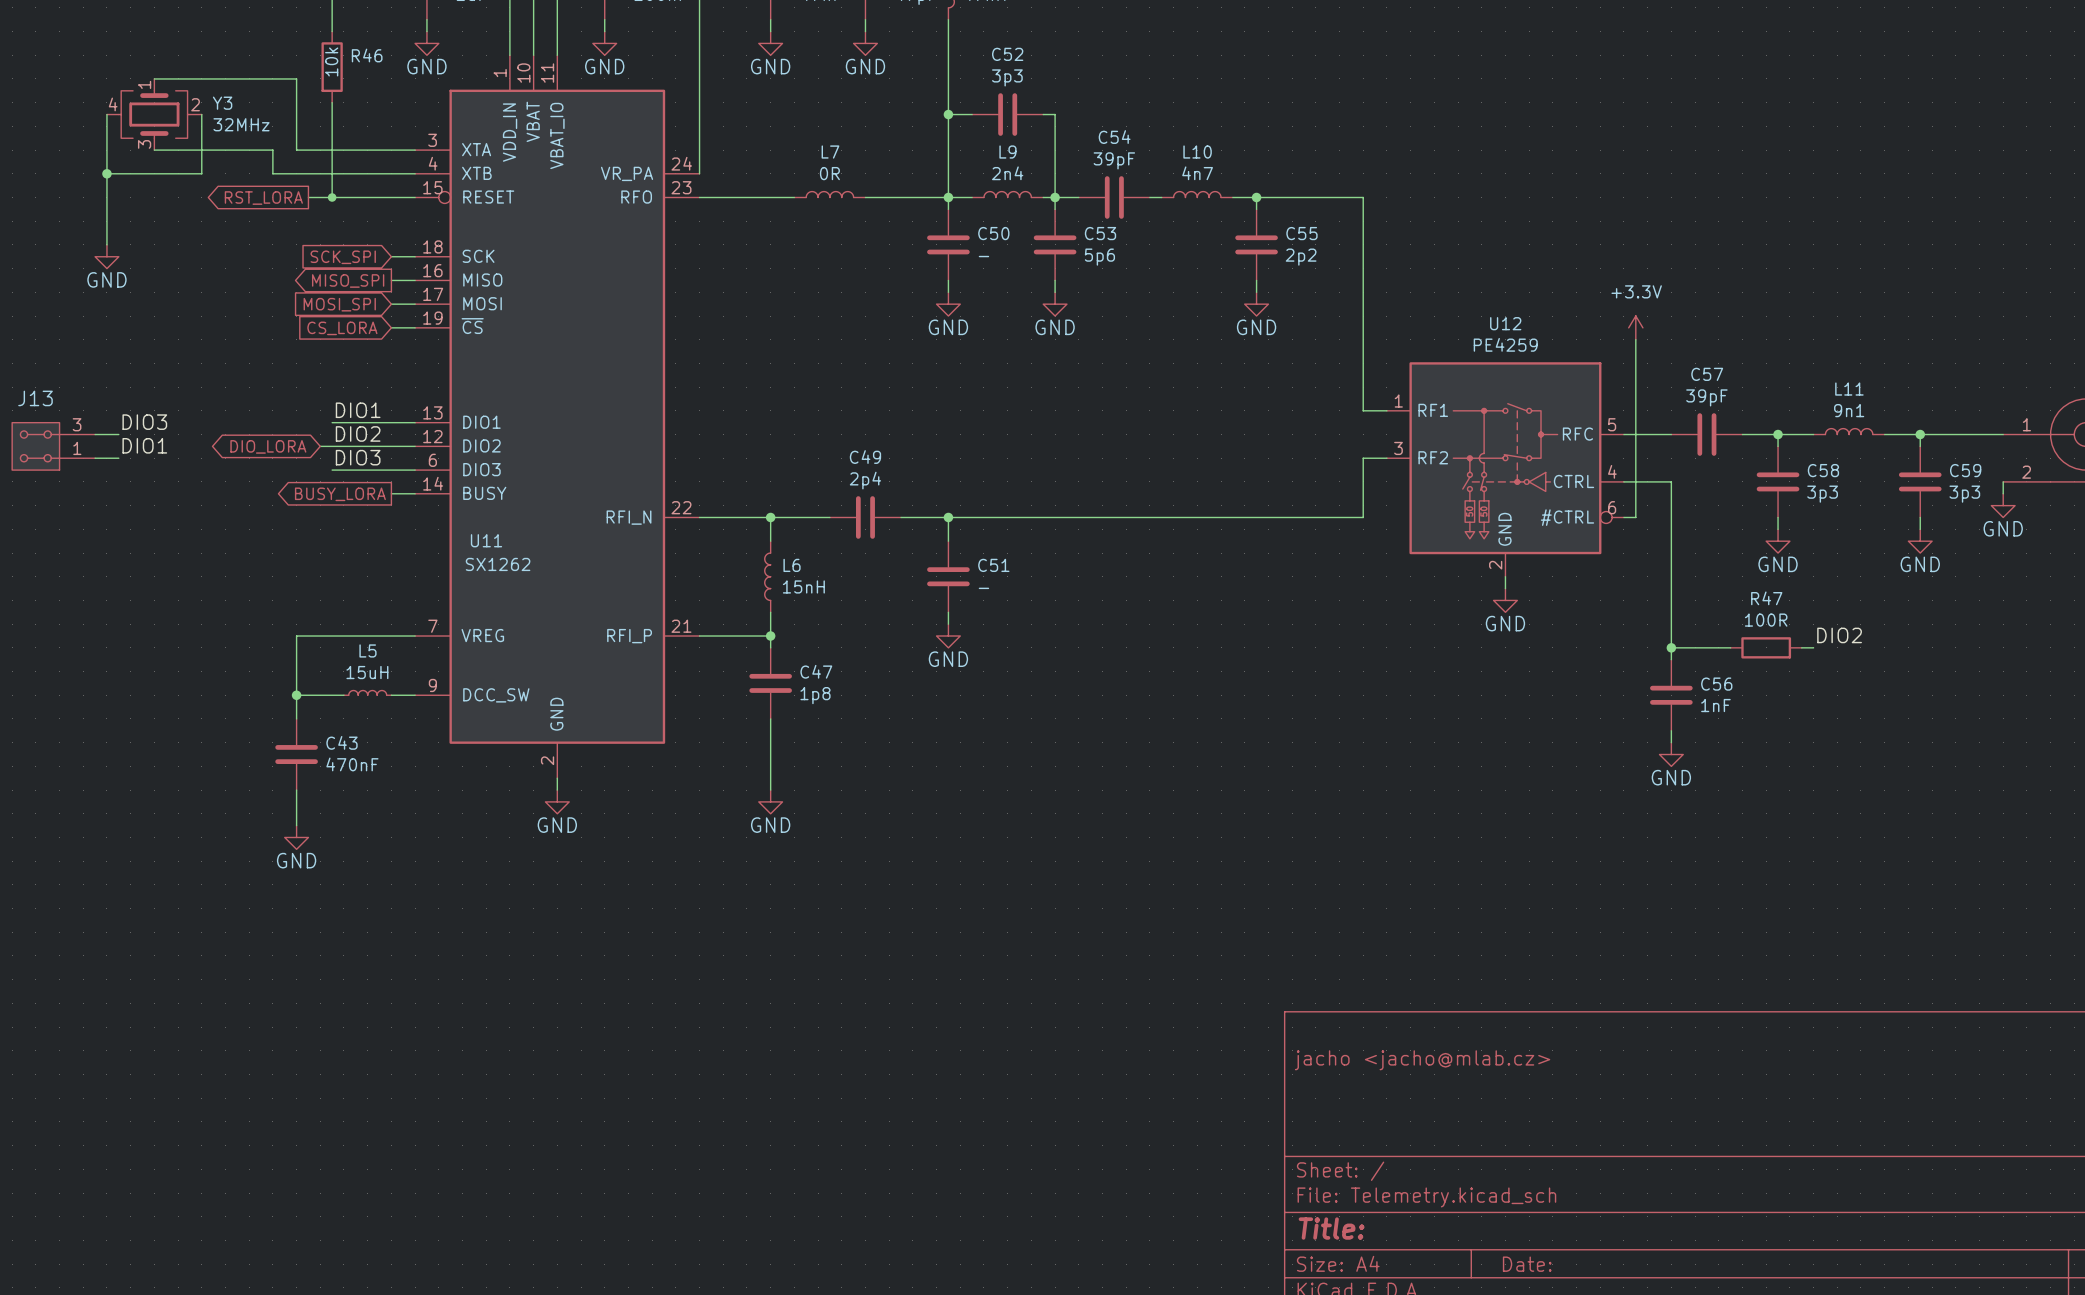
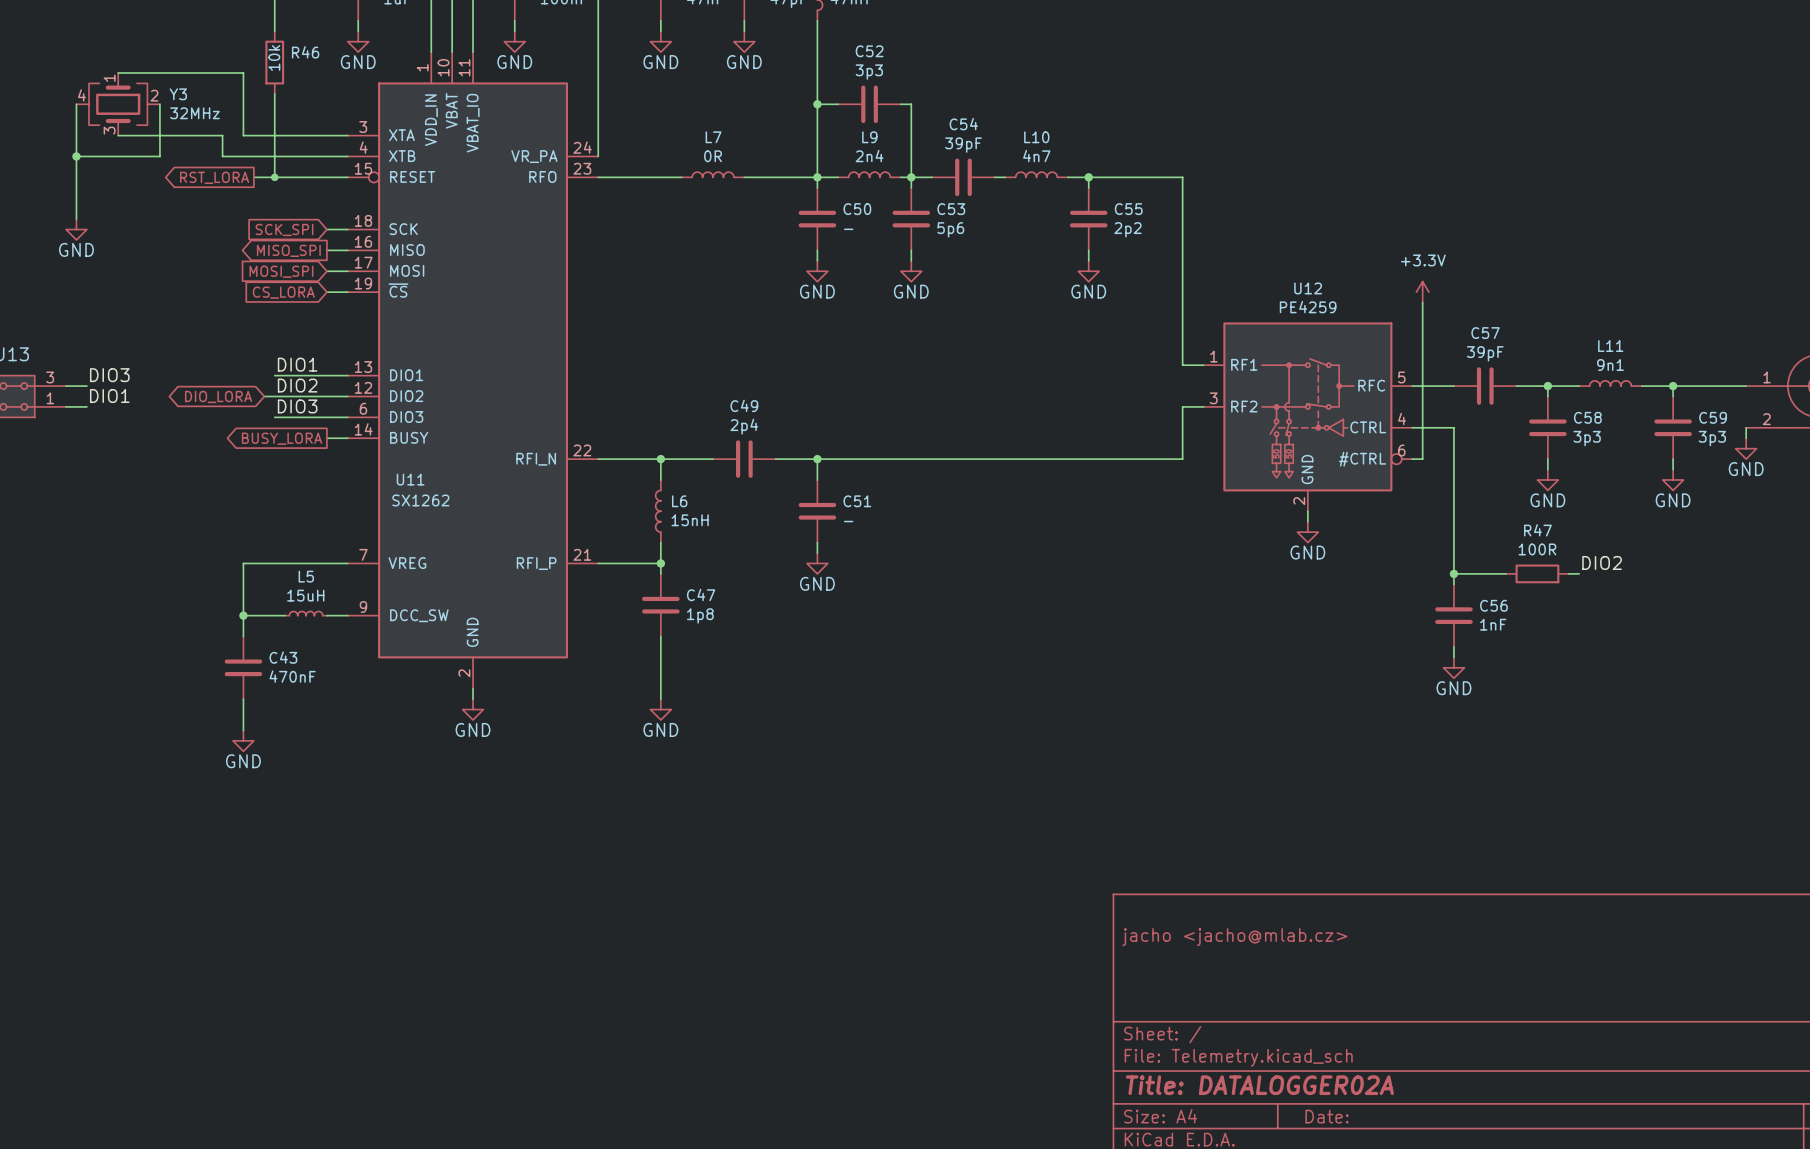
title block: Title: (1331, 1228) -> Title: DATALOGGER02A (1259, 1085)

